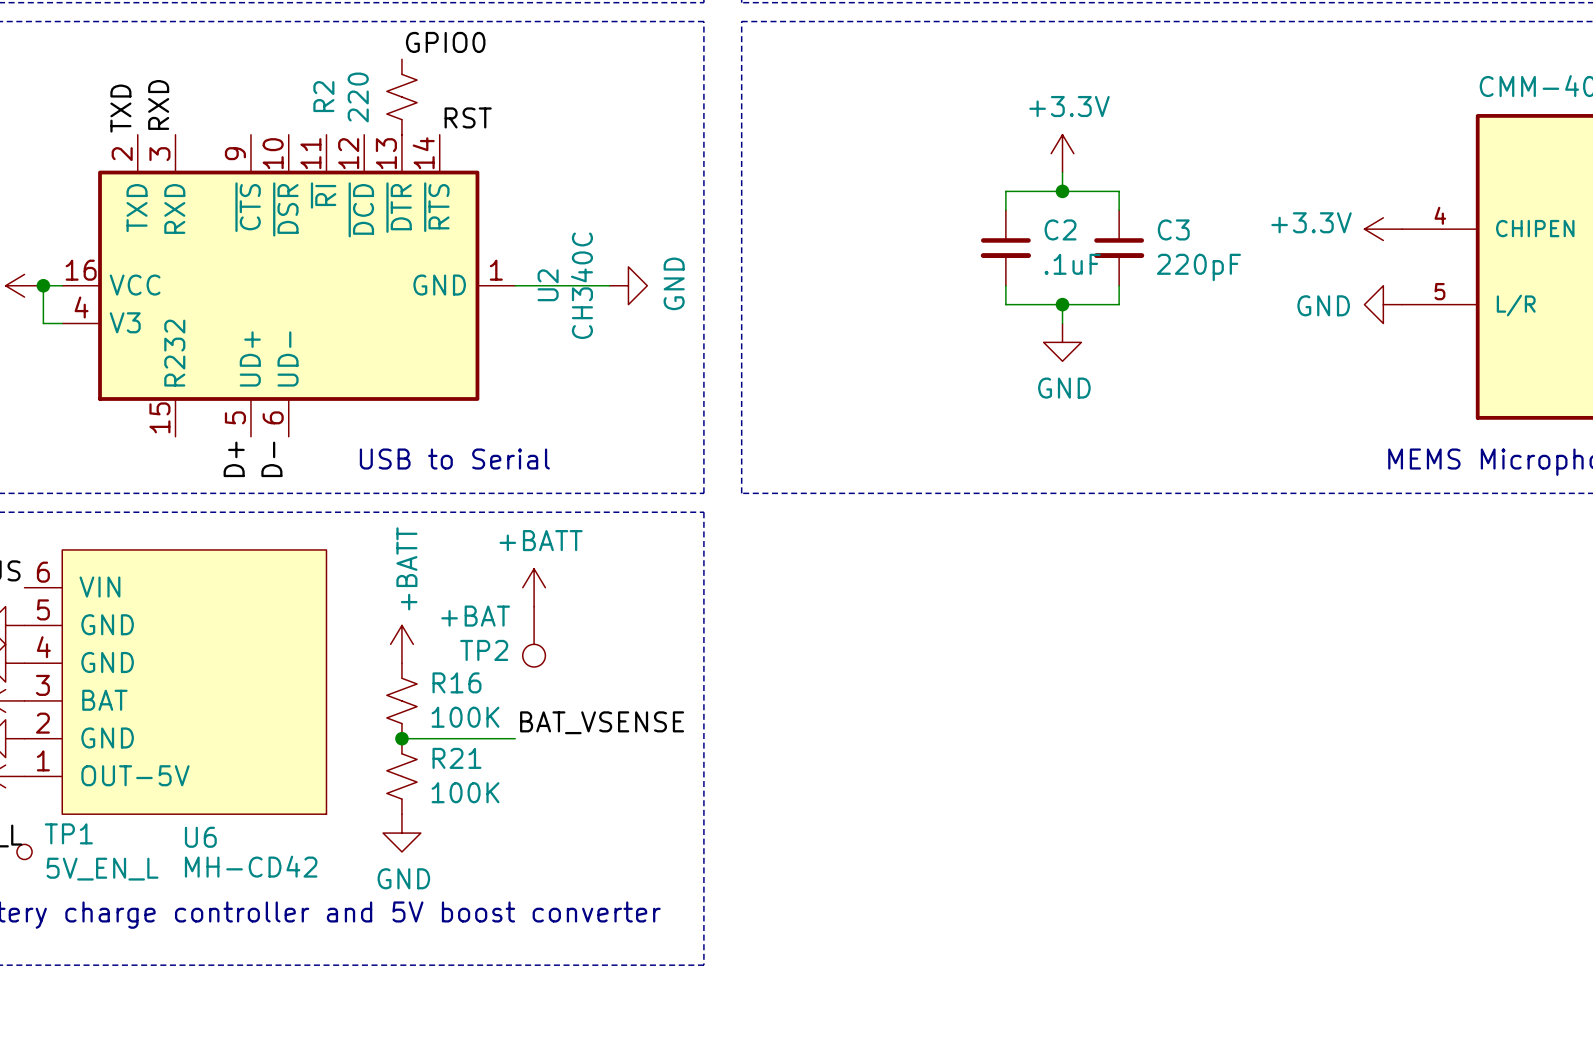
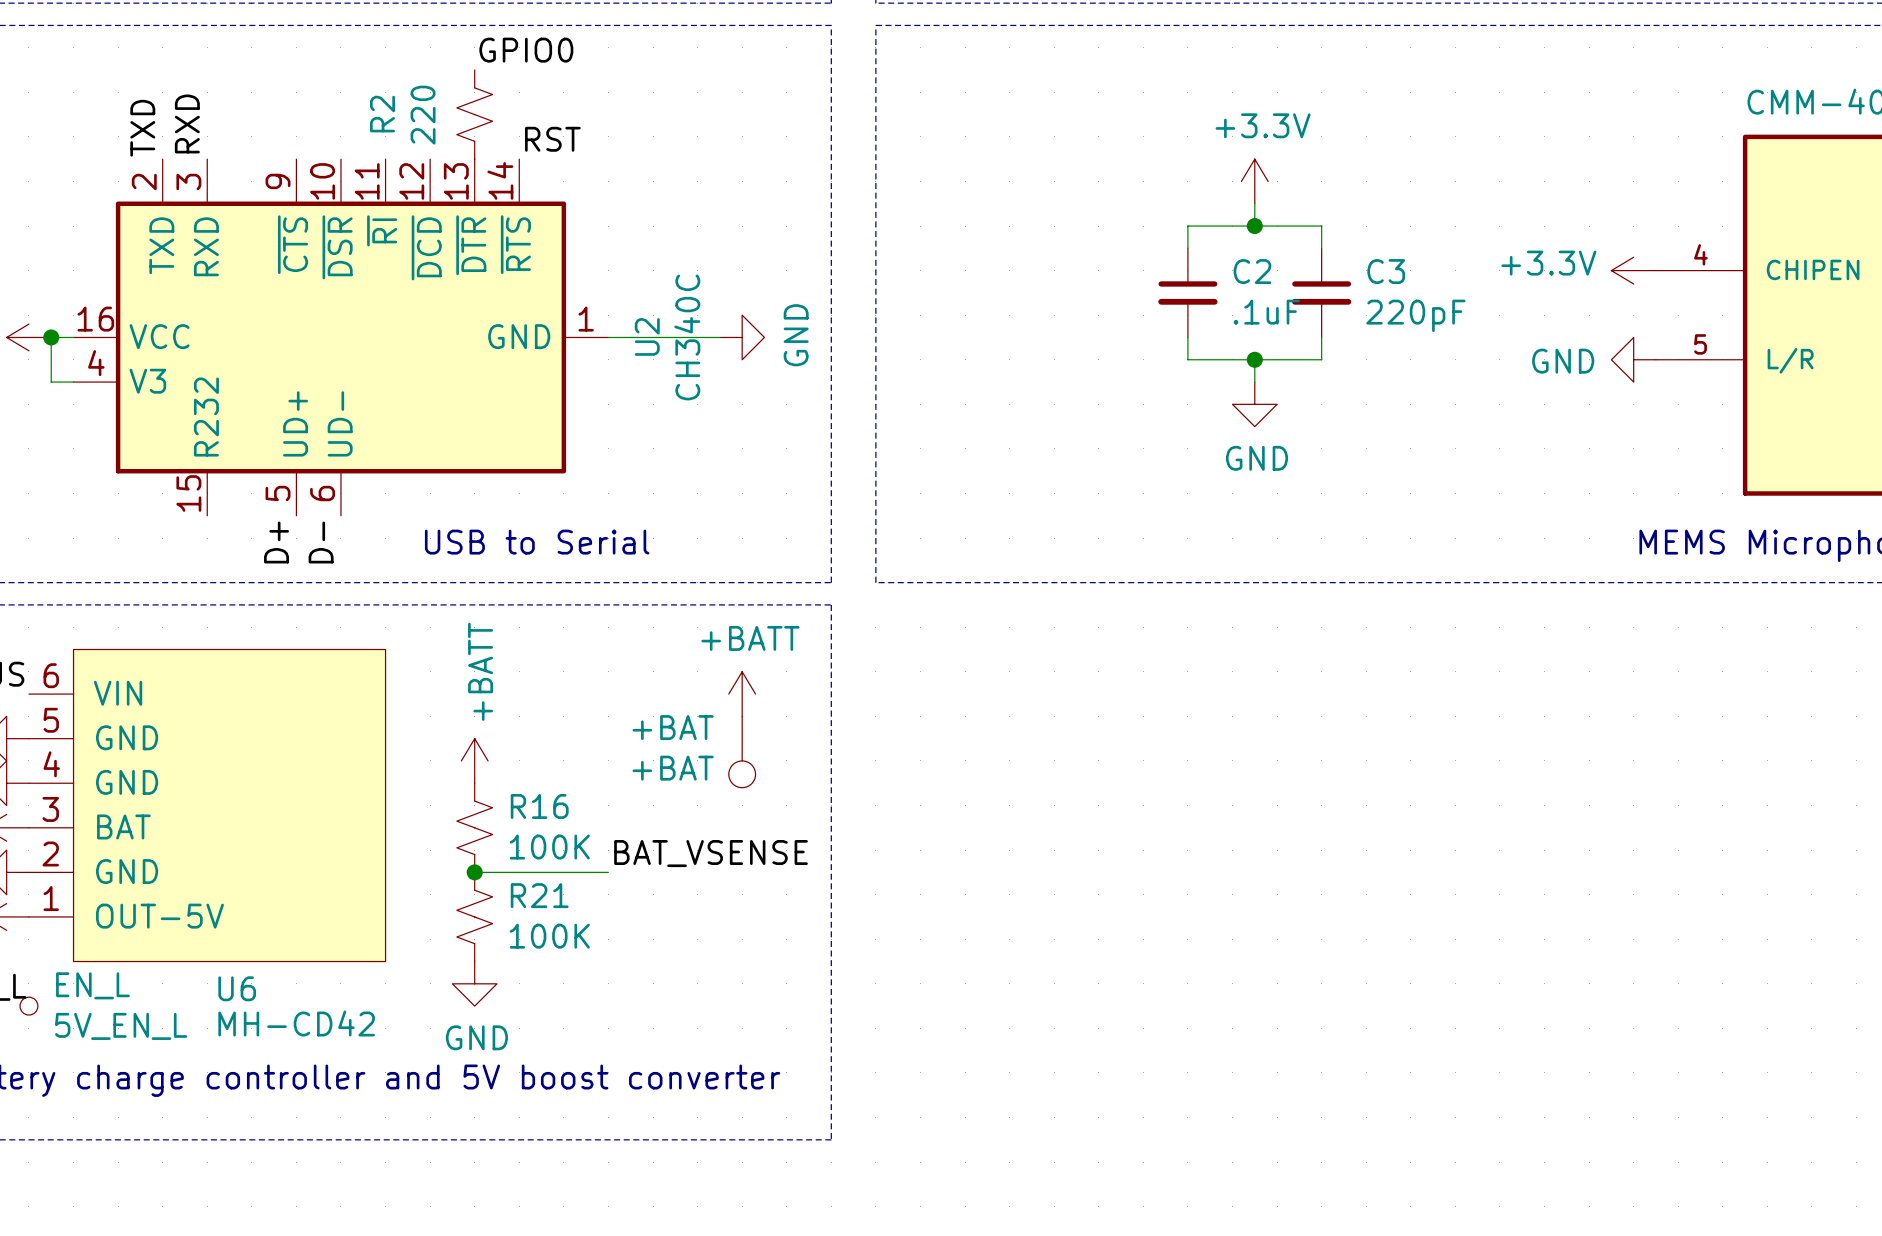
power symbol position: +BATT (534, 587) -> +BATT (742, 694)
TP2: +BAT (534, 636) -> none
+BAT: none -> +BAT (742, 752)
TP1 name: TP1 (68, 833) -> EN_L (92, 985)

